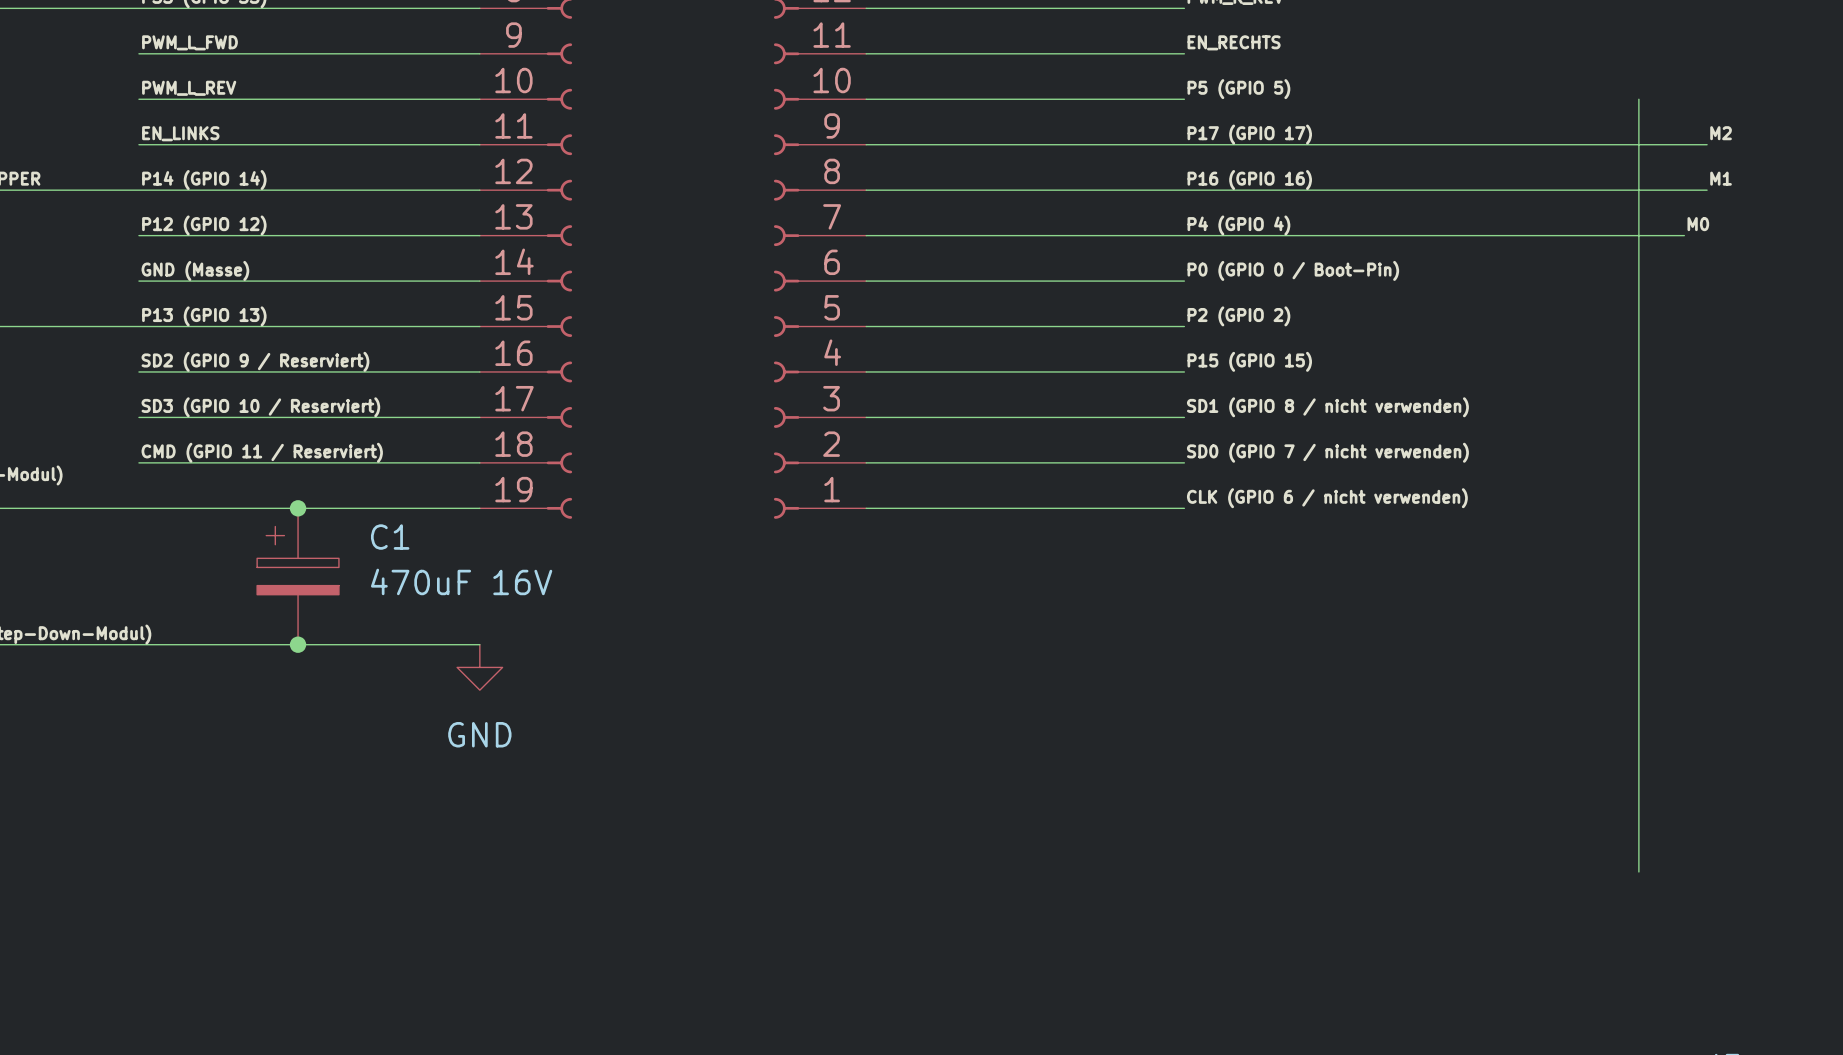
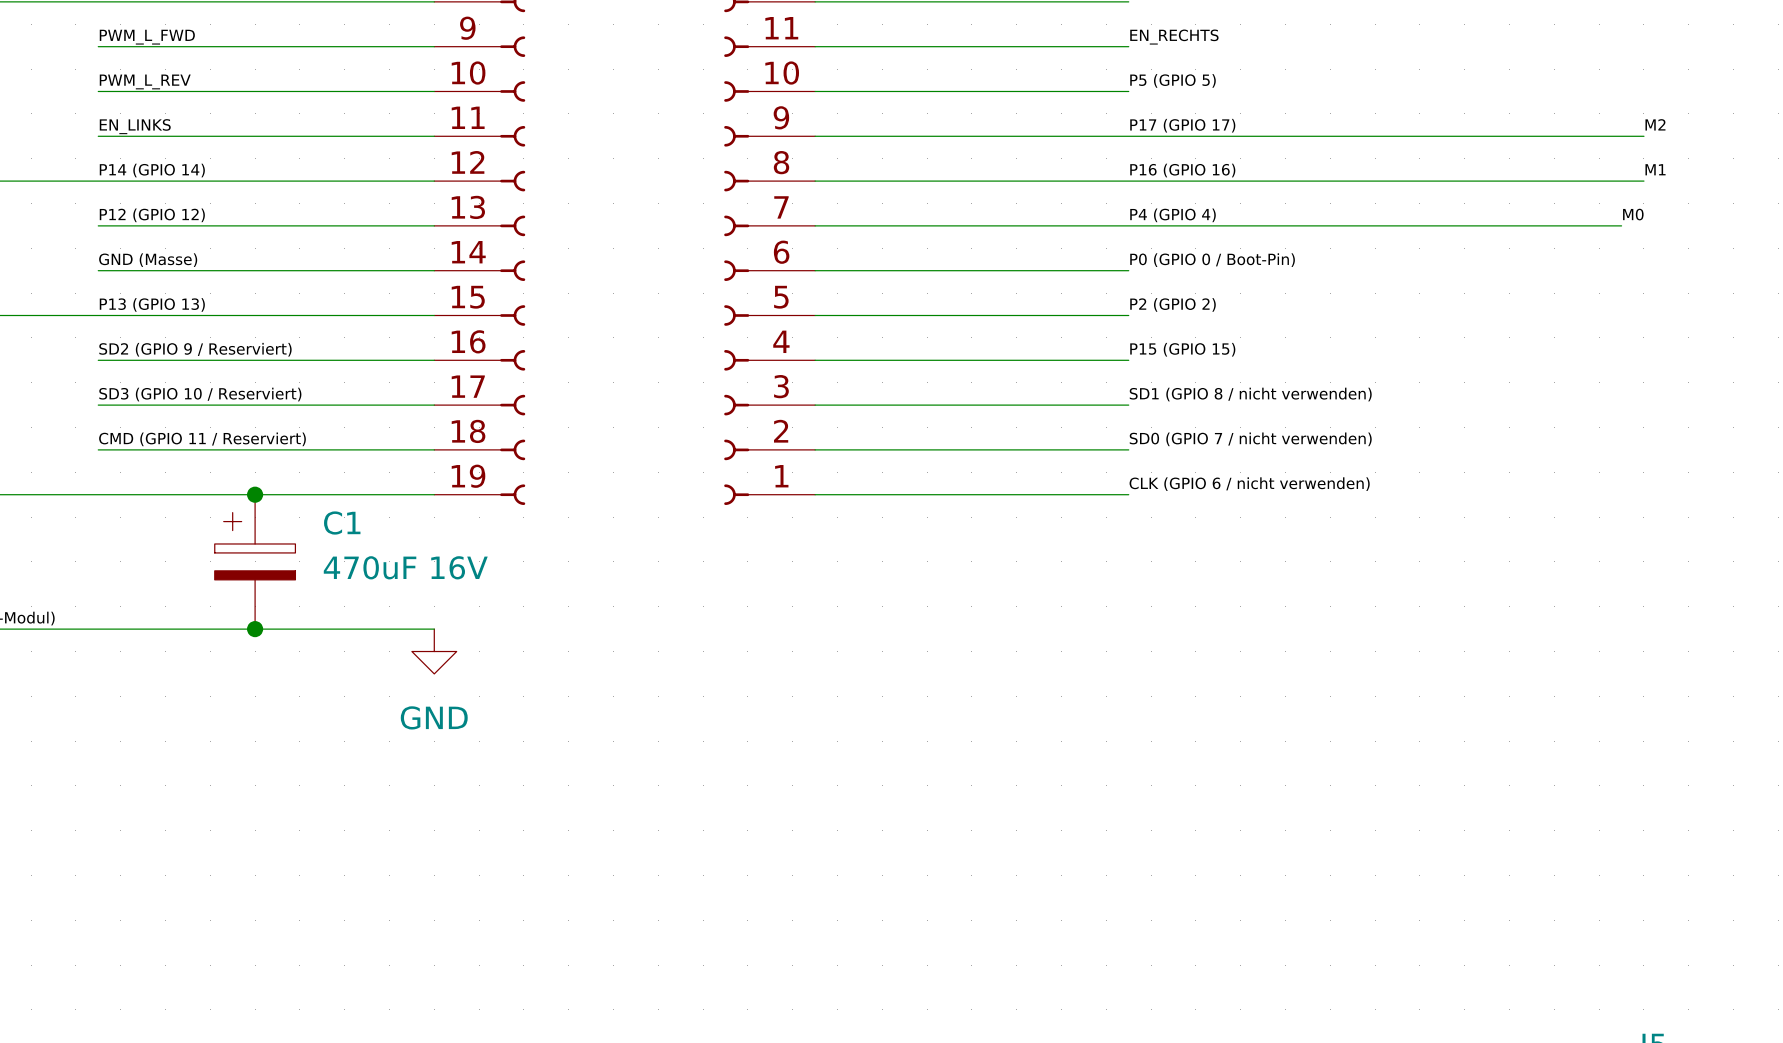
wire: (1638, 99) (1638, 871) -> none

